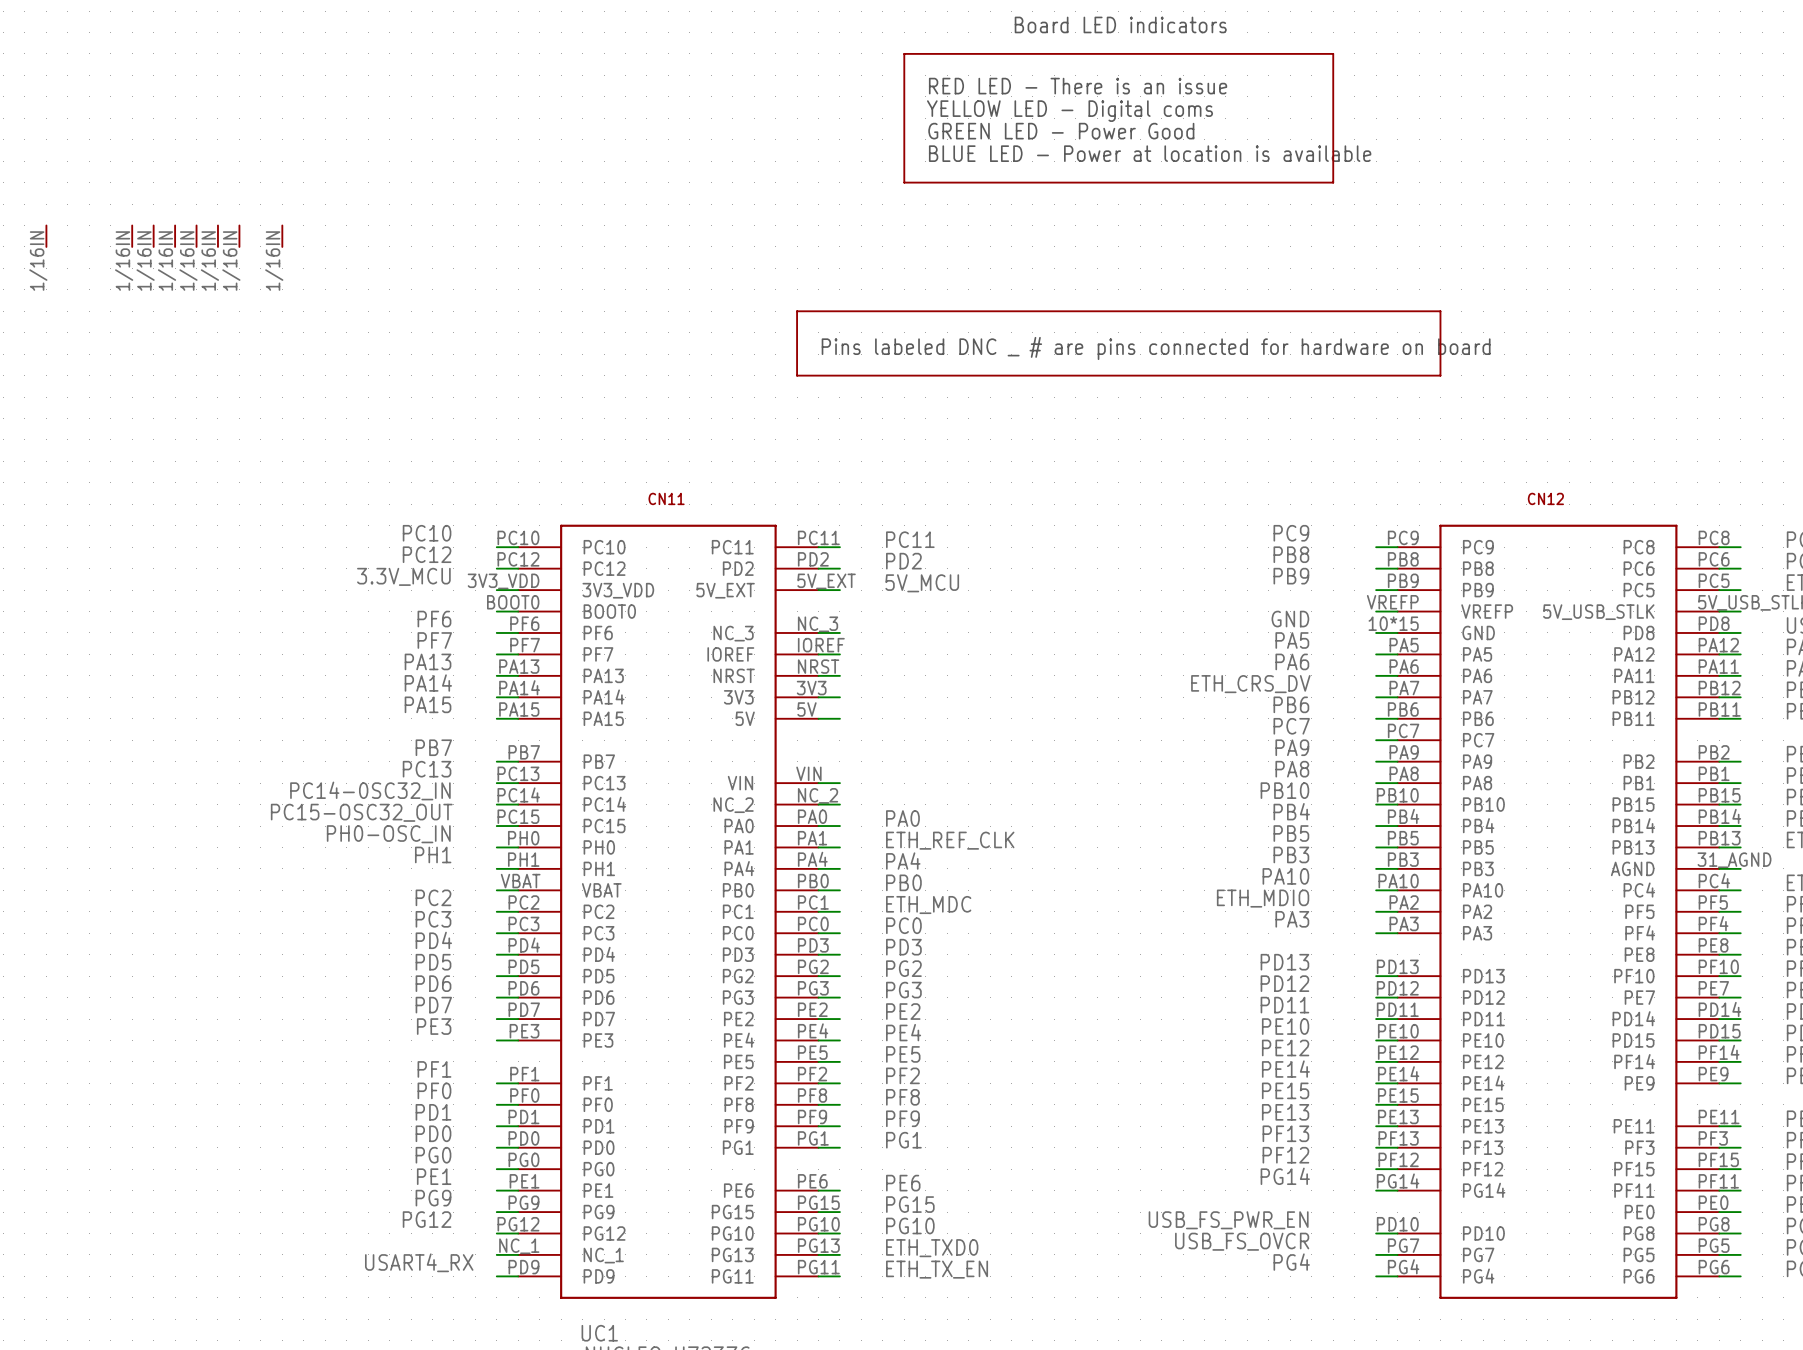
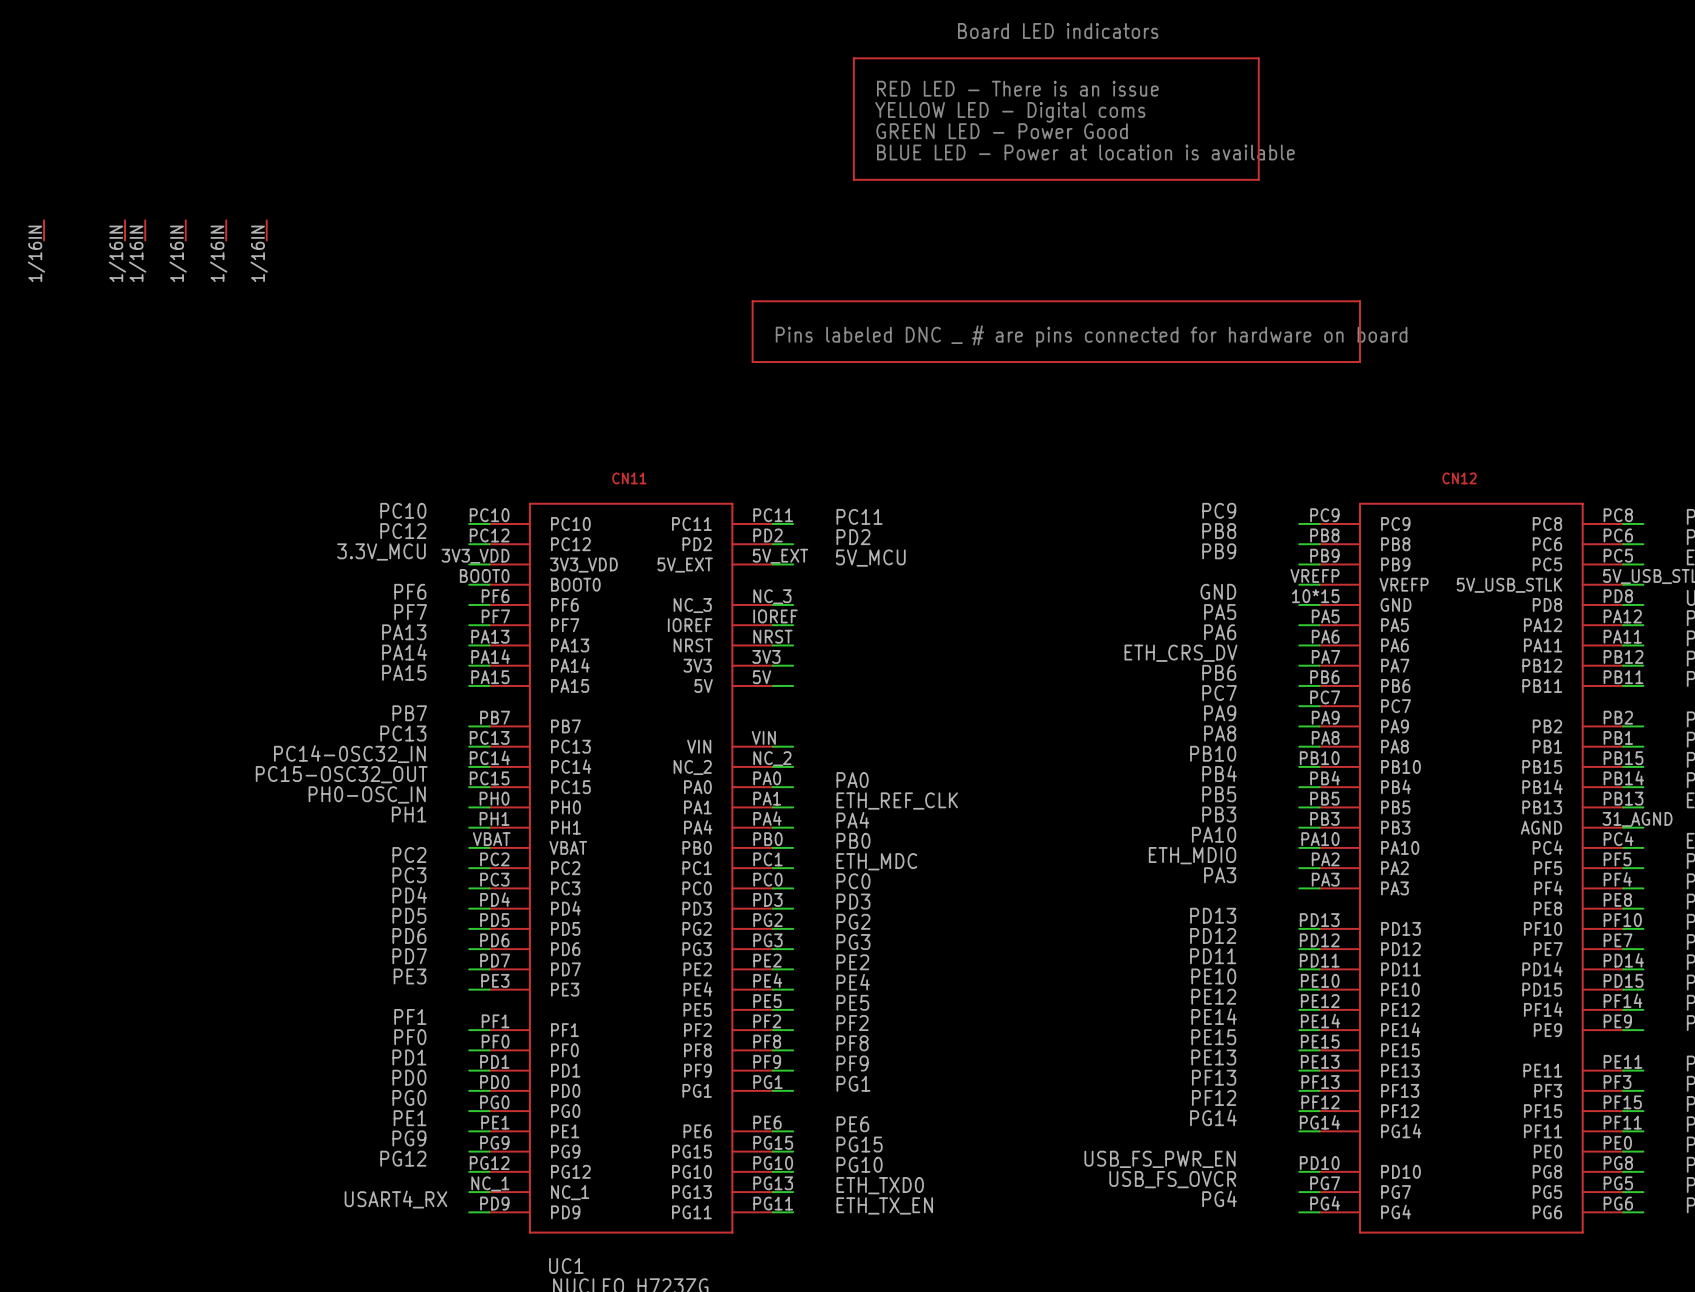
part: (175, 236) -> none
part: (217, 236) -> none

